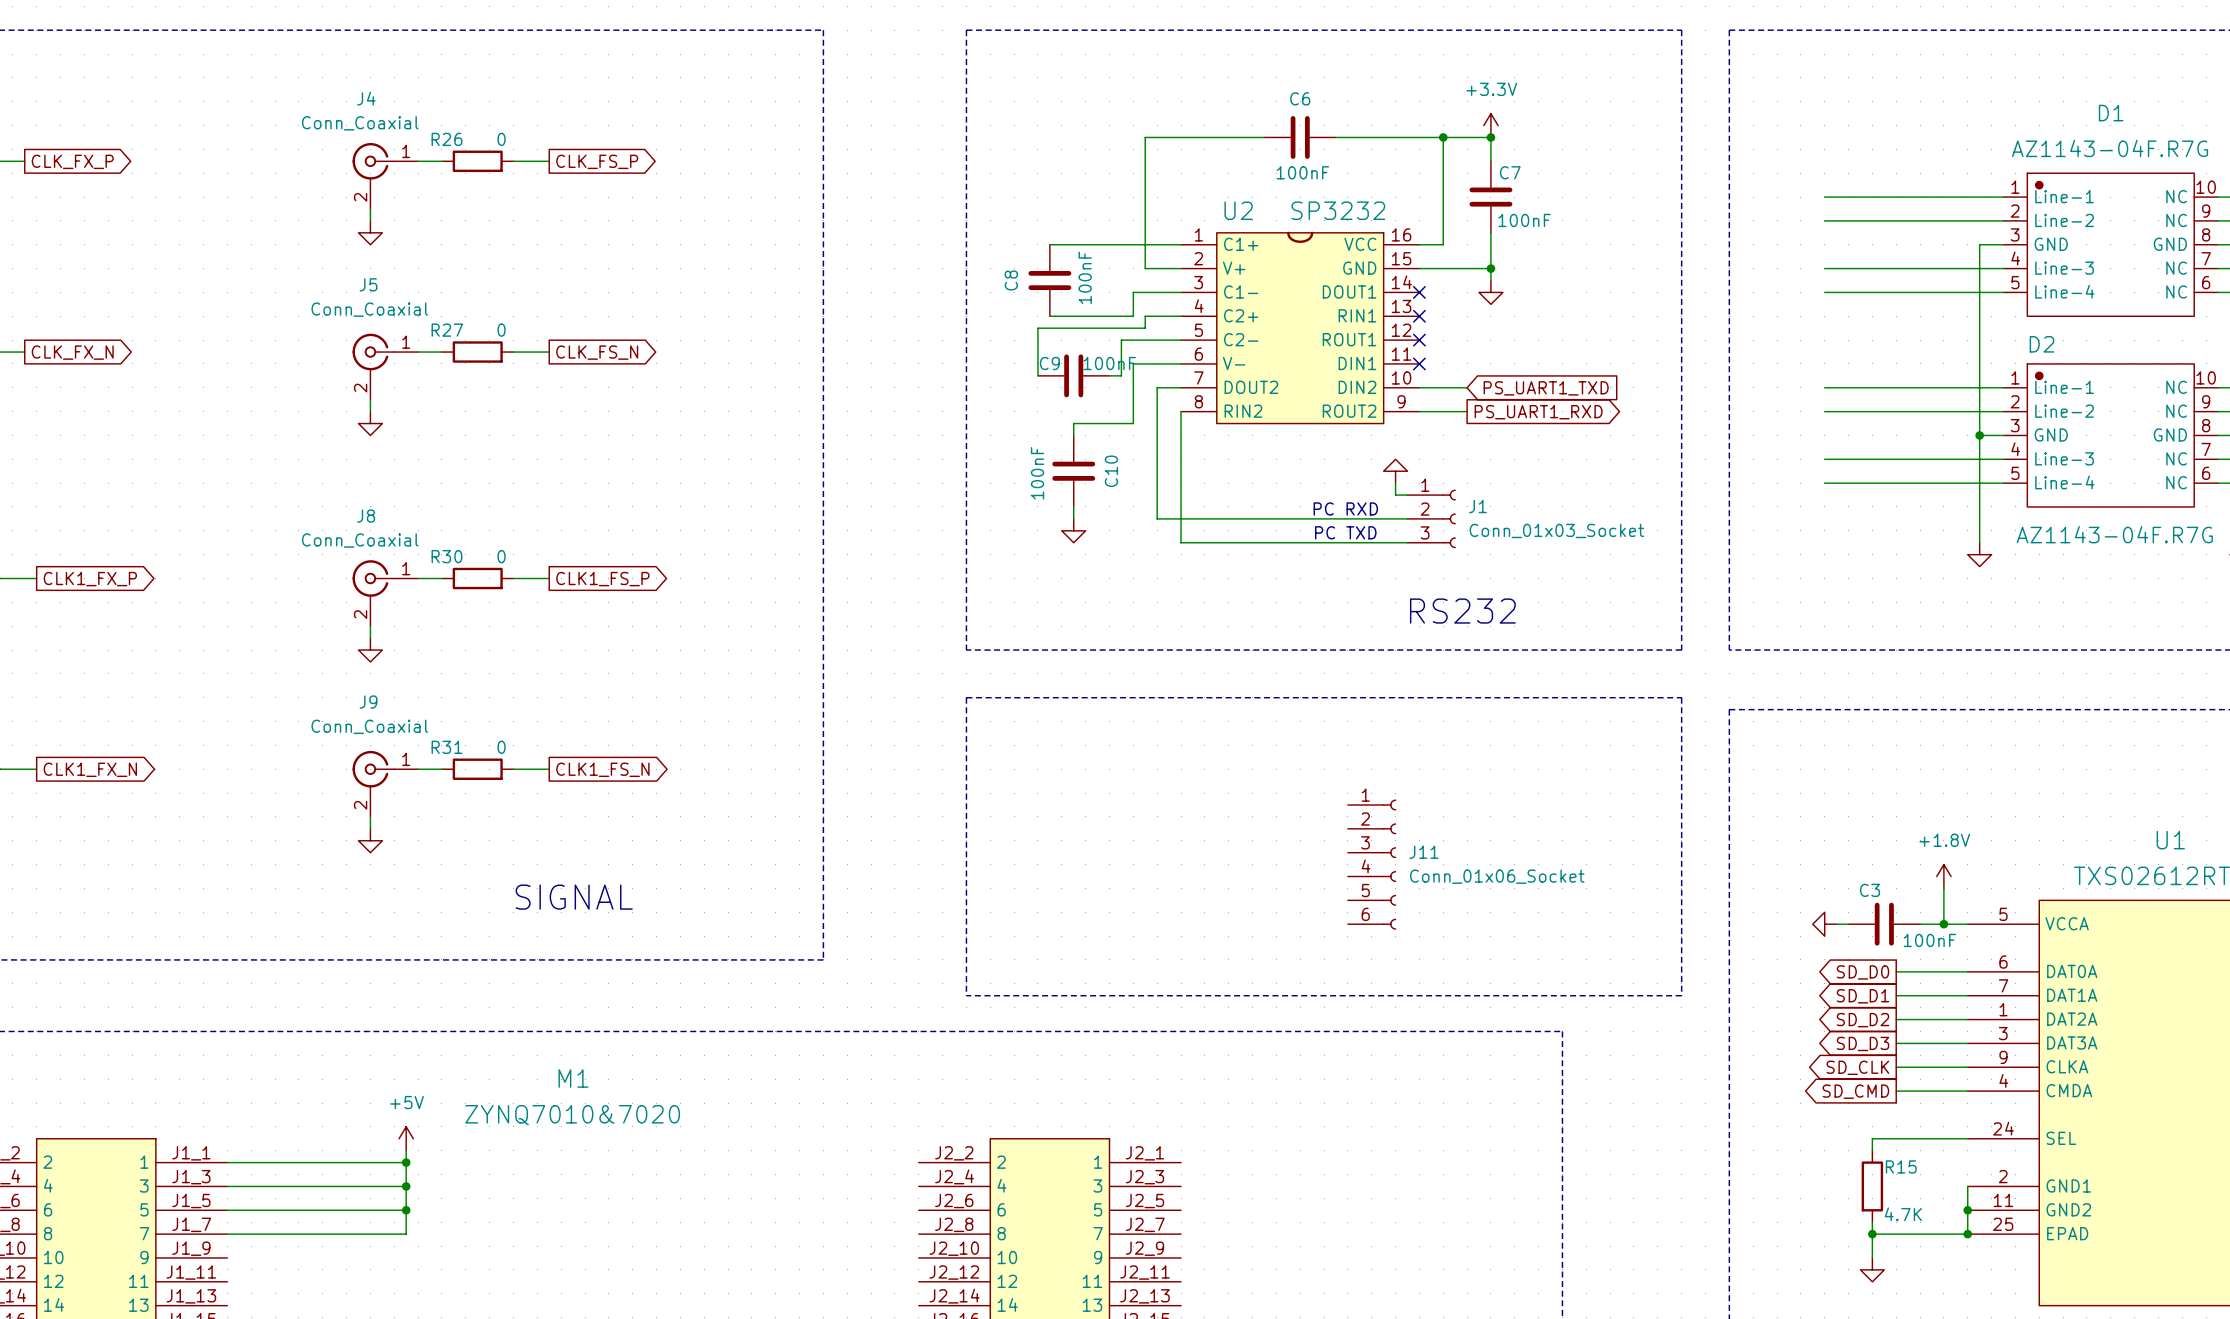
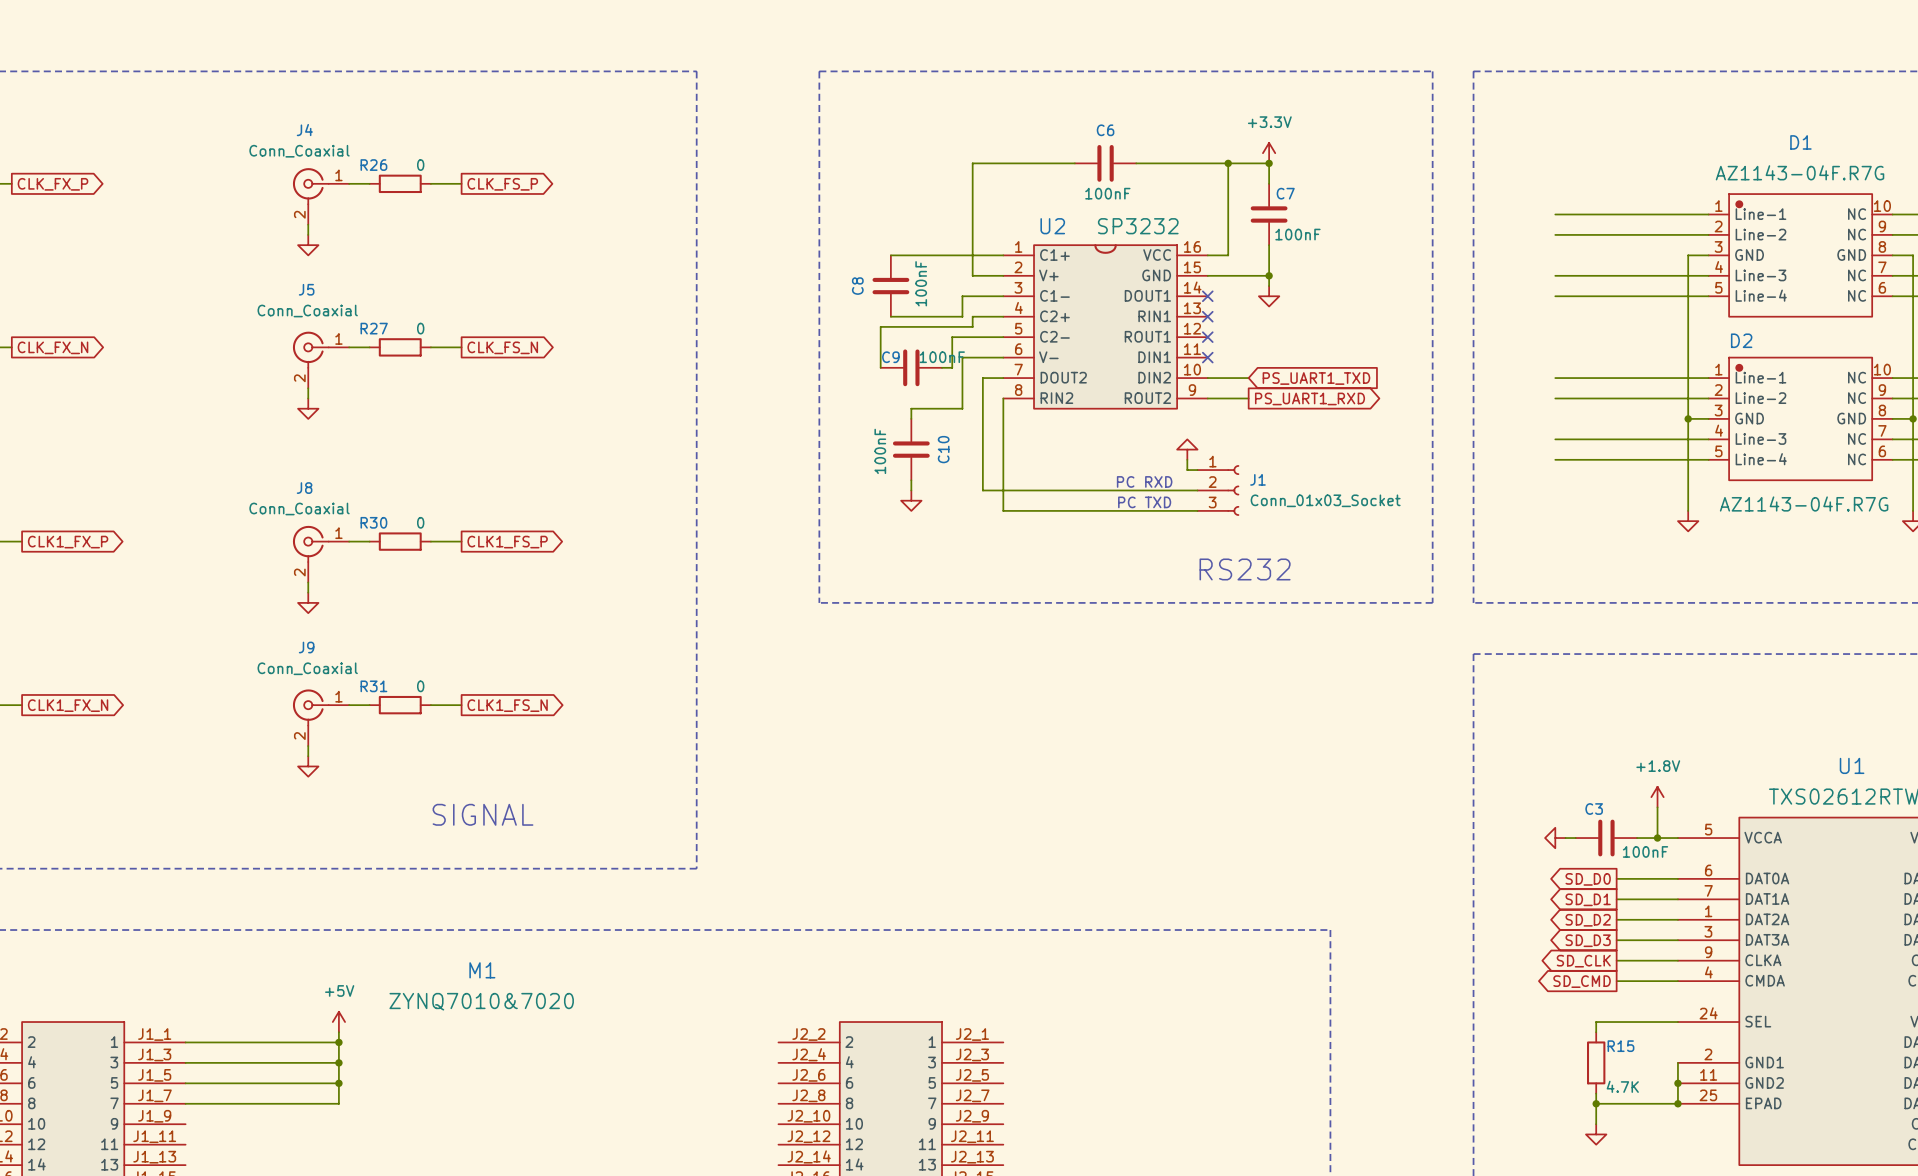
line: (966, 697) (966, 995) (1681, 995) (1681, 697) (966, 697) -> none
J11: Conn_01x06_Socket (1372, 864) -> none

